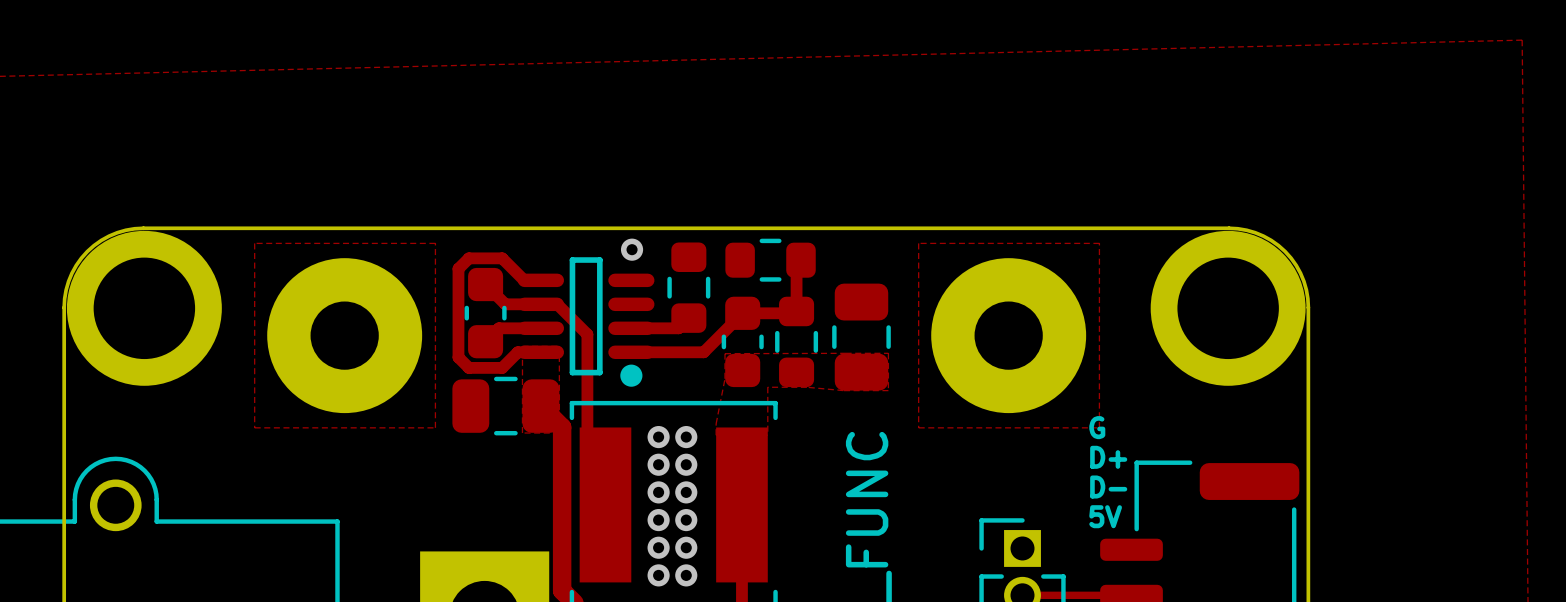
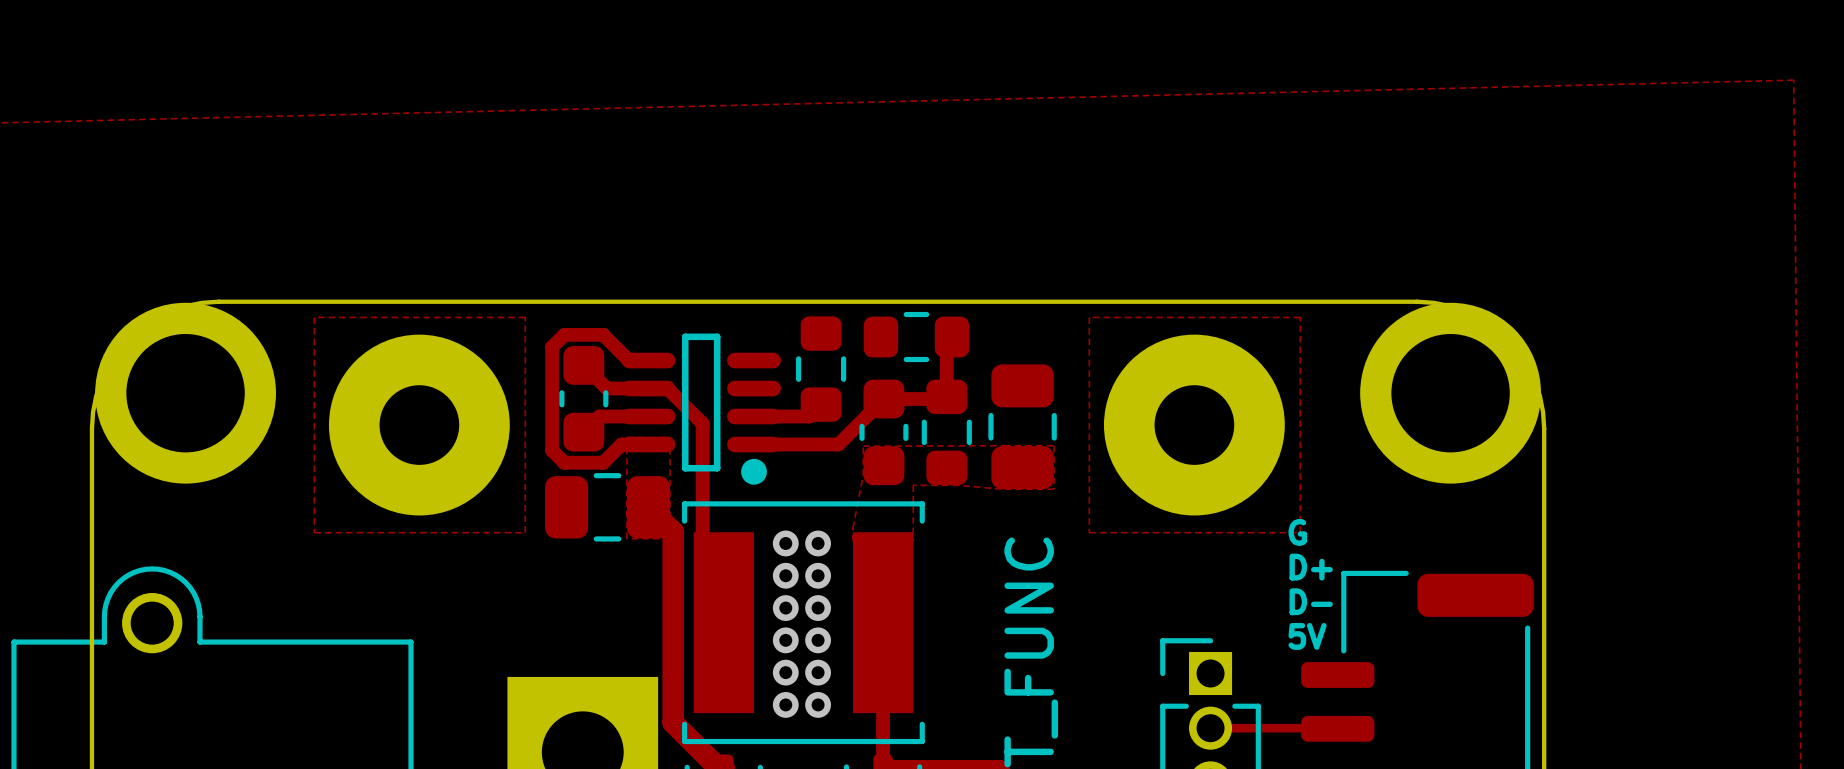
via: (632, 249) -> none
board edge: (64, 338) (66, 289) (72, 273) (81, 258) (94, 245) (109, 236) (125, 230) (143, 228) (1237, 228) (1255, 232) (1271, 240) (1285, 251) (1296, 265) (1303, 281) (1307, 298) (1308, 338) -> (91, 428) (93, 412) (101, 380) (108, 365) (129, 338) (155, 318) (170, 311) (186, 306) (218, 301) (1433, 302) (1465, 311) (1494, 327) (1506, 338) (1527, 365) (1534, 380) (1539, 395) (1544, 428)

